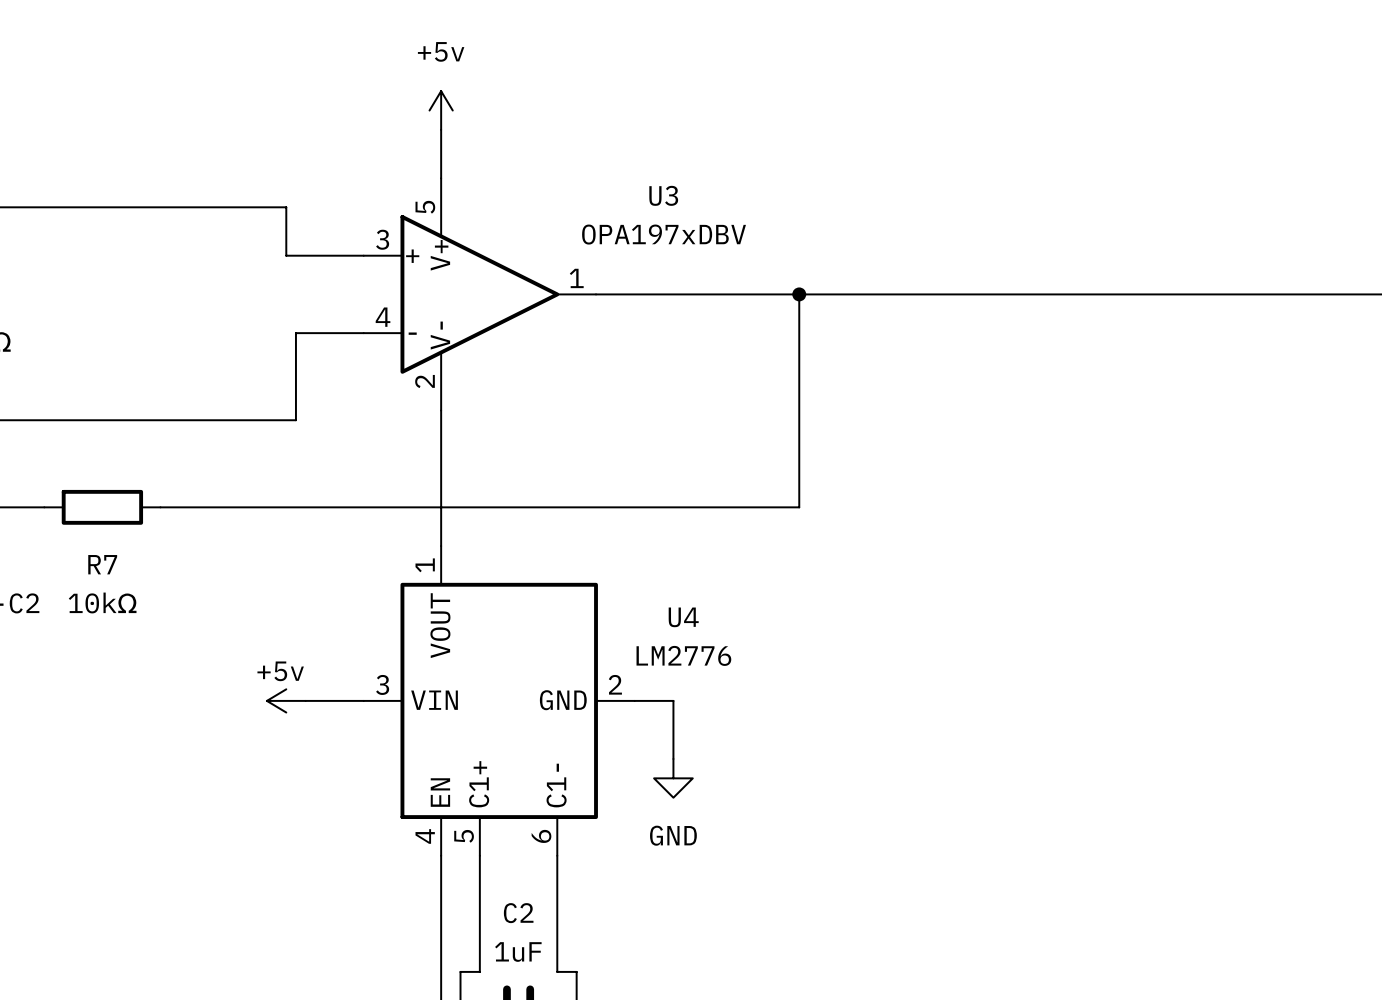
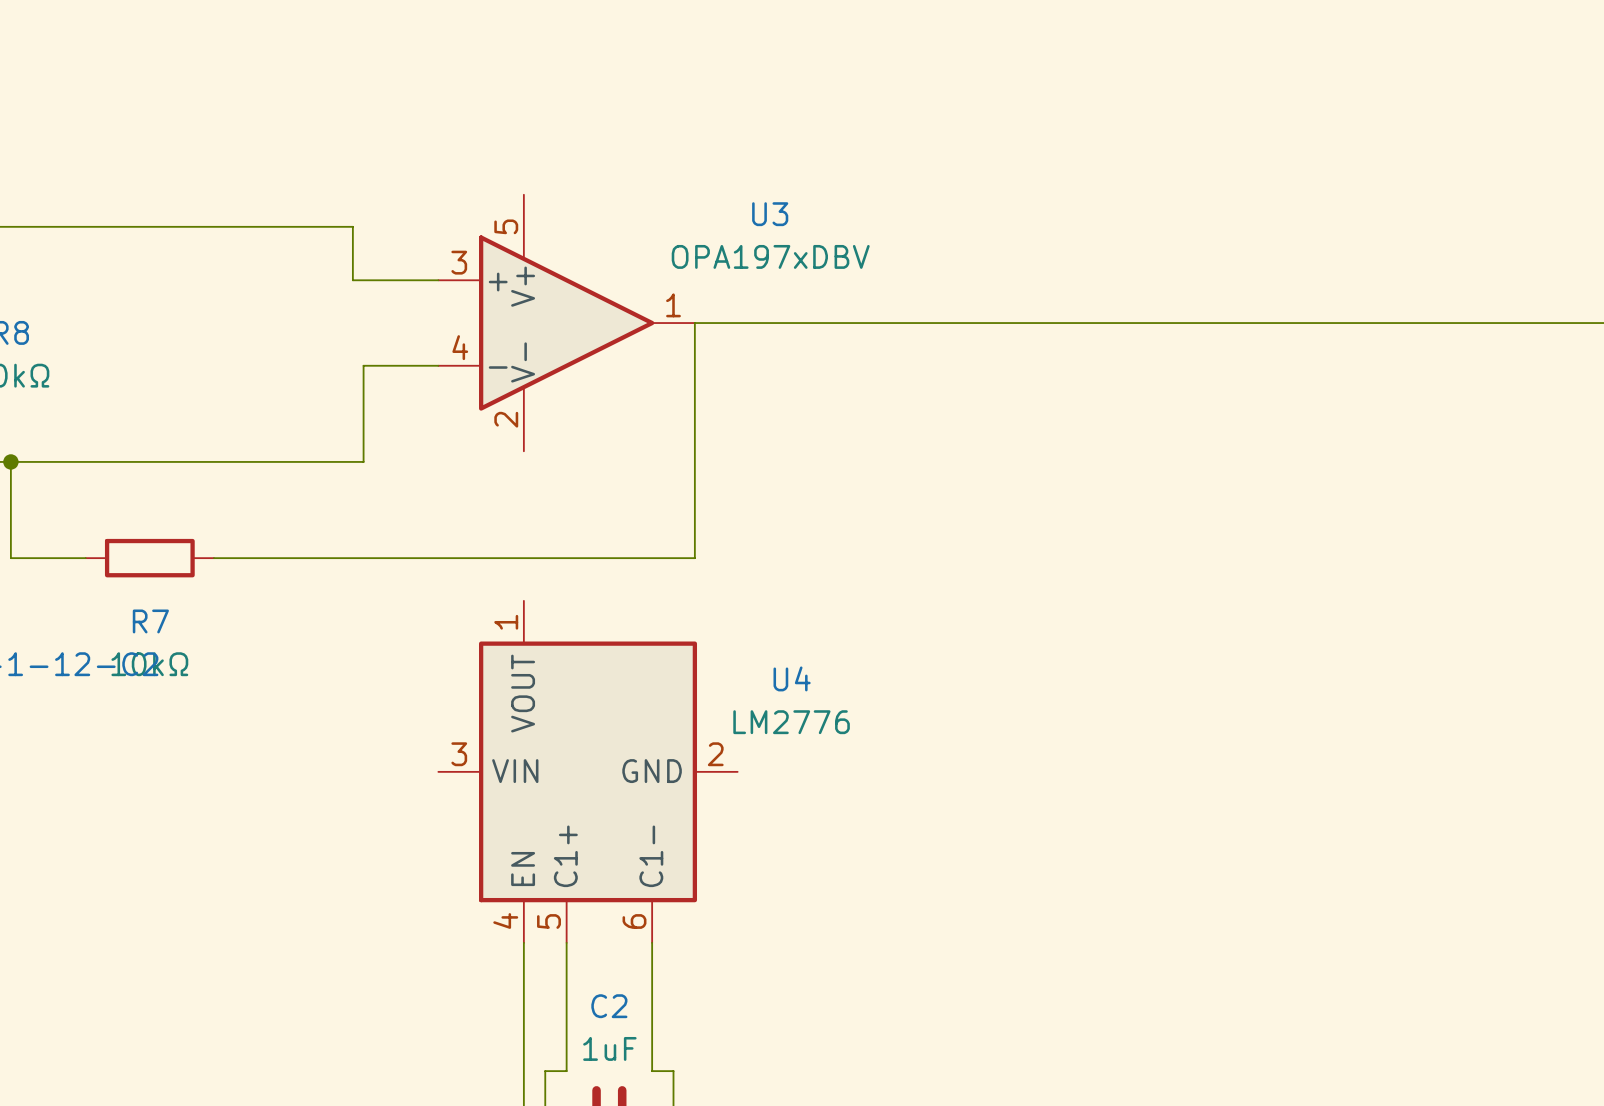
power symbol: +5v (441, 110) -> none
wire: (441, 129) (441, 178) -> none
wire: (799, 294) (799, 507) (596, 507) -> (694, 323) (694, 558)
junction: (799, 294) -> none
wire: (441, 410) (441, 546) -> none
power symbol: +5v (286, 700) -> none
wire: (305, 700) (363, 700) -> none
wire: (634, 700) (673, 700) (673, 758) -> none
power symbol: GND (673, 778) -> none

